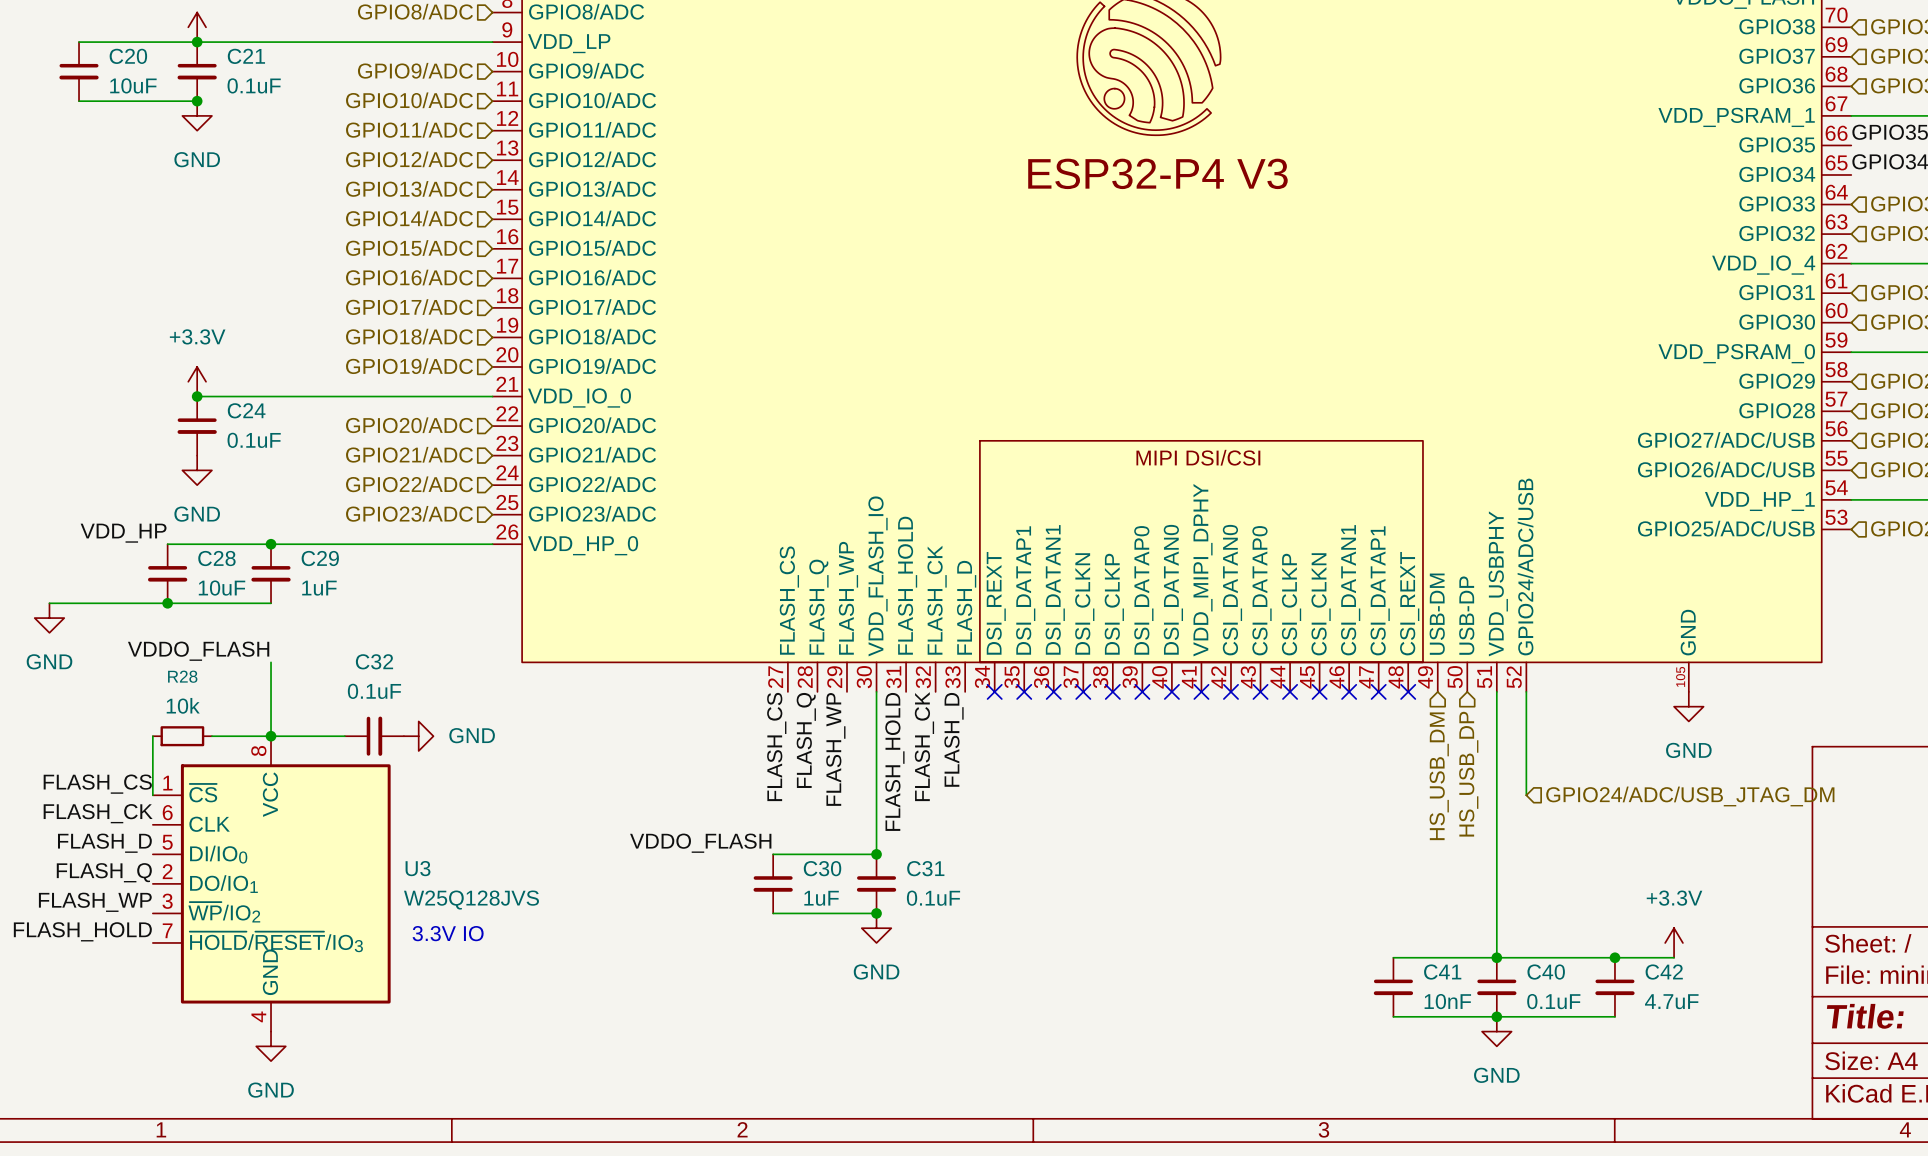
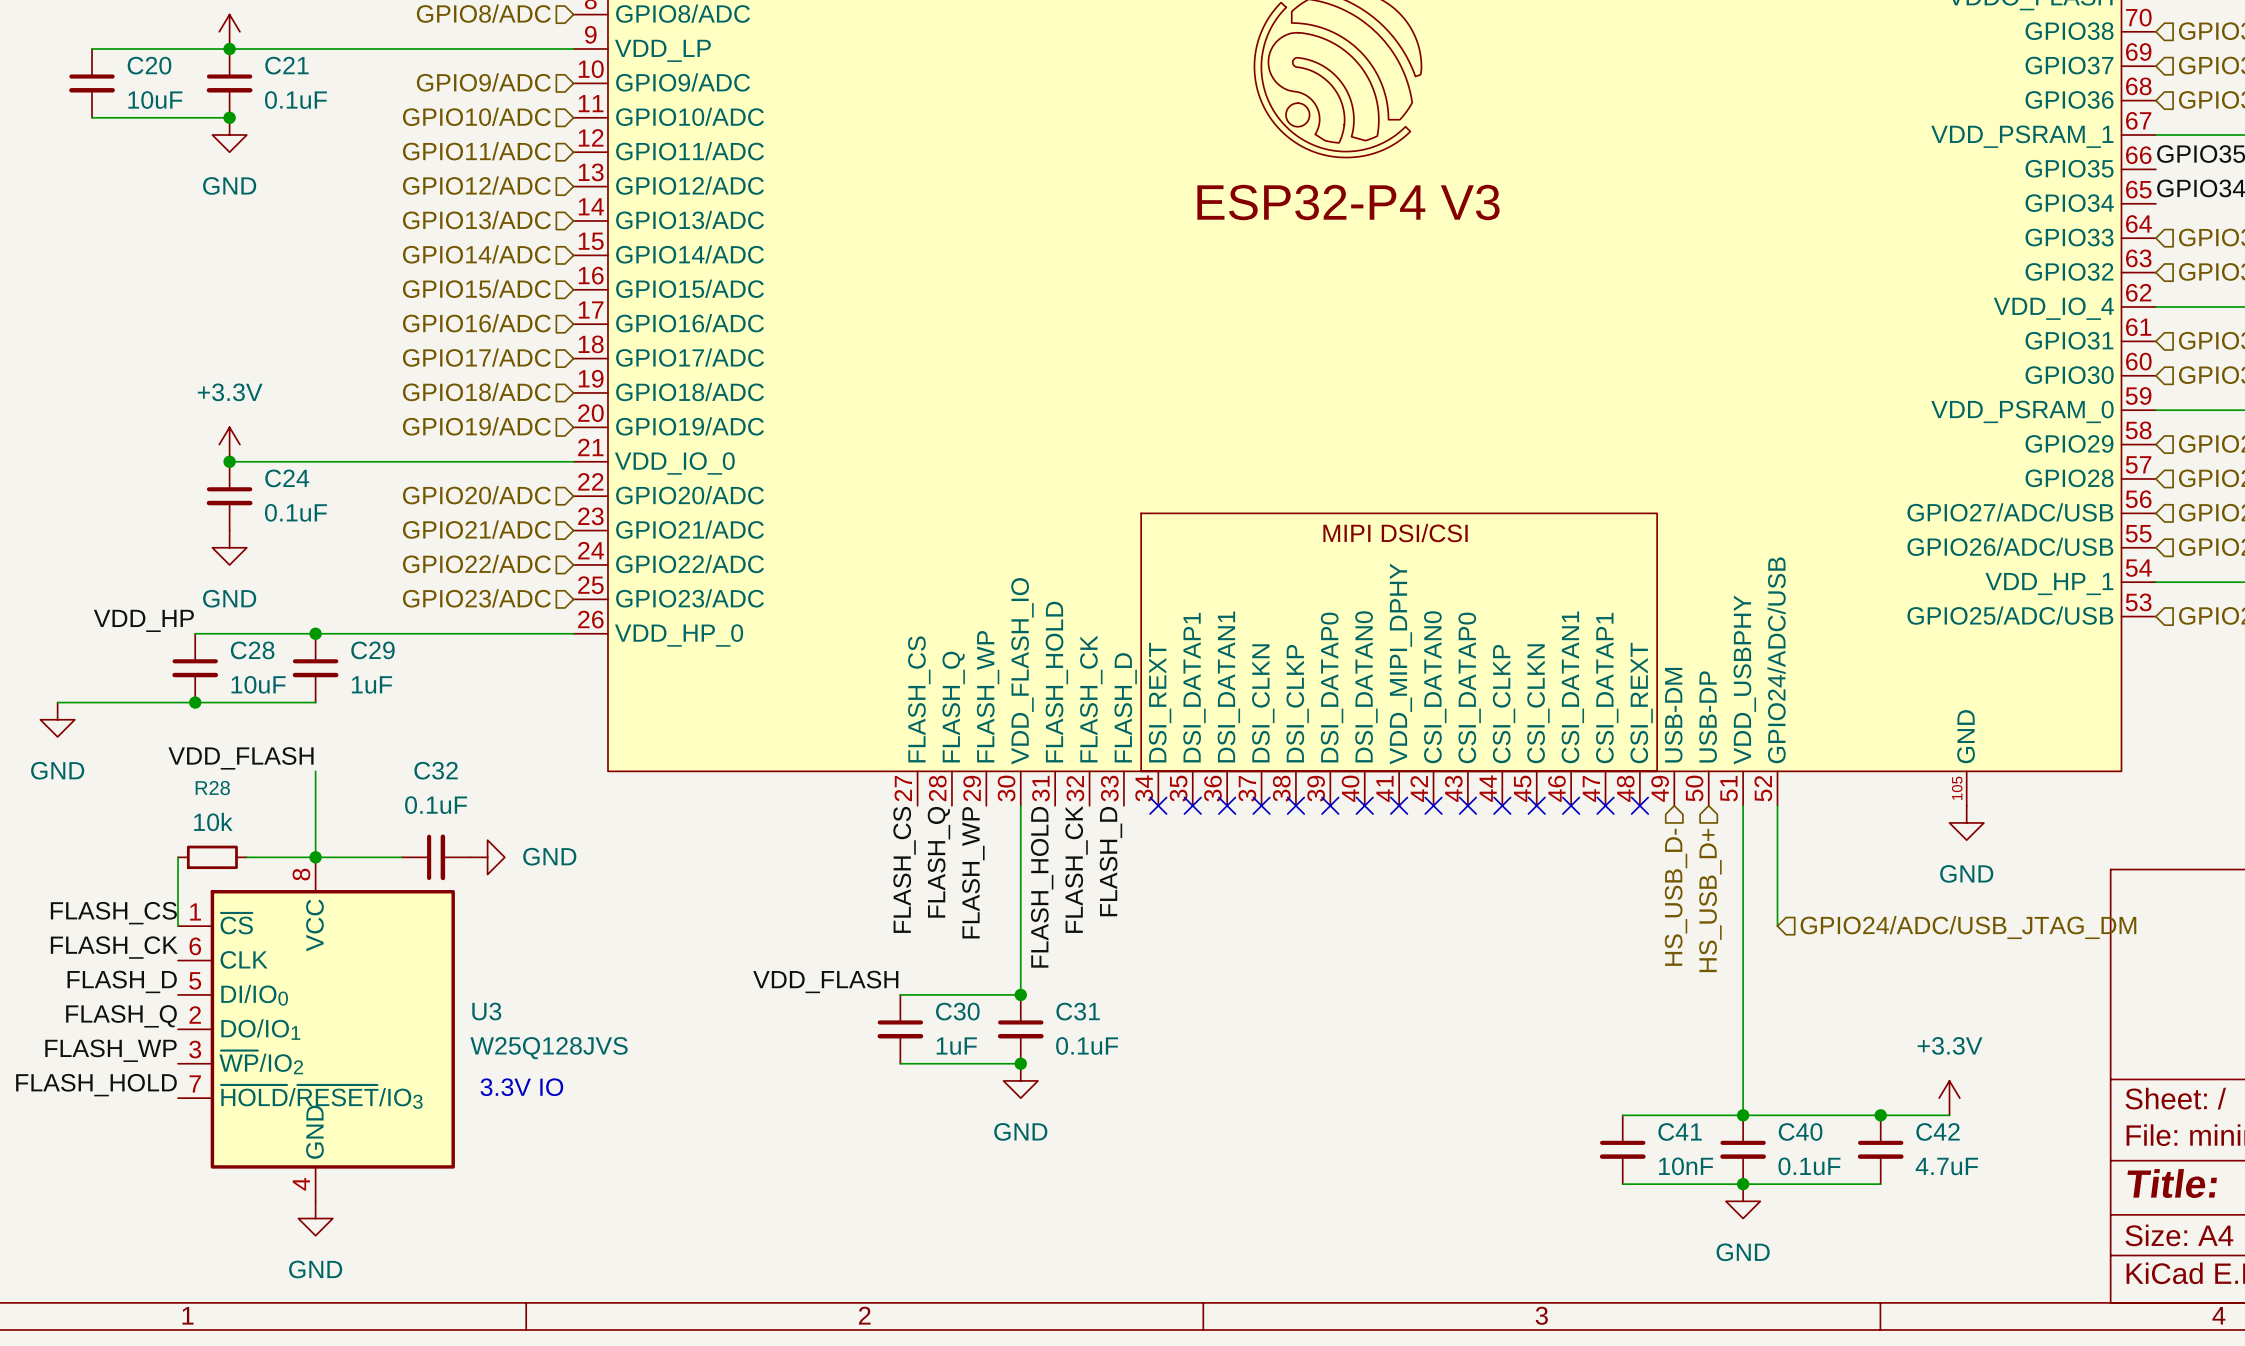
label: VDDO_FLASH (198, 651) -> VDD_FLASH (241, 758)
hierarchical label: HS_USB_DP (1468, 774) -> HS_USB_D+ (1710, 900)
hierarchical label: HS_USB_DM (1439, 776) -> HS_USB_D- (1676, 897)
label: VDDO_FLASH (700, 843) -> VDD_FLASH (825, 981)

